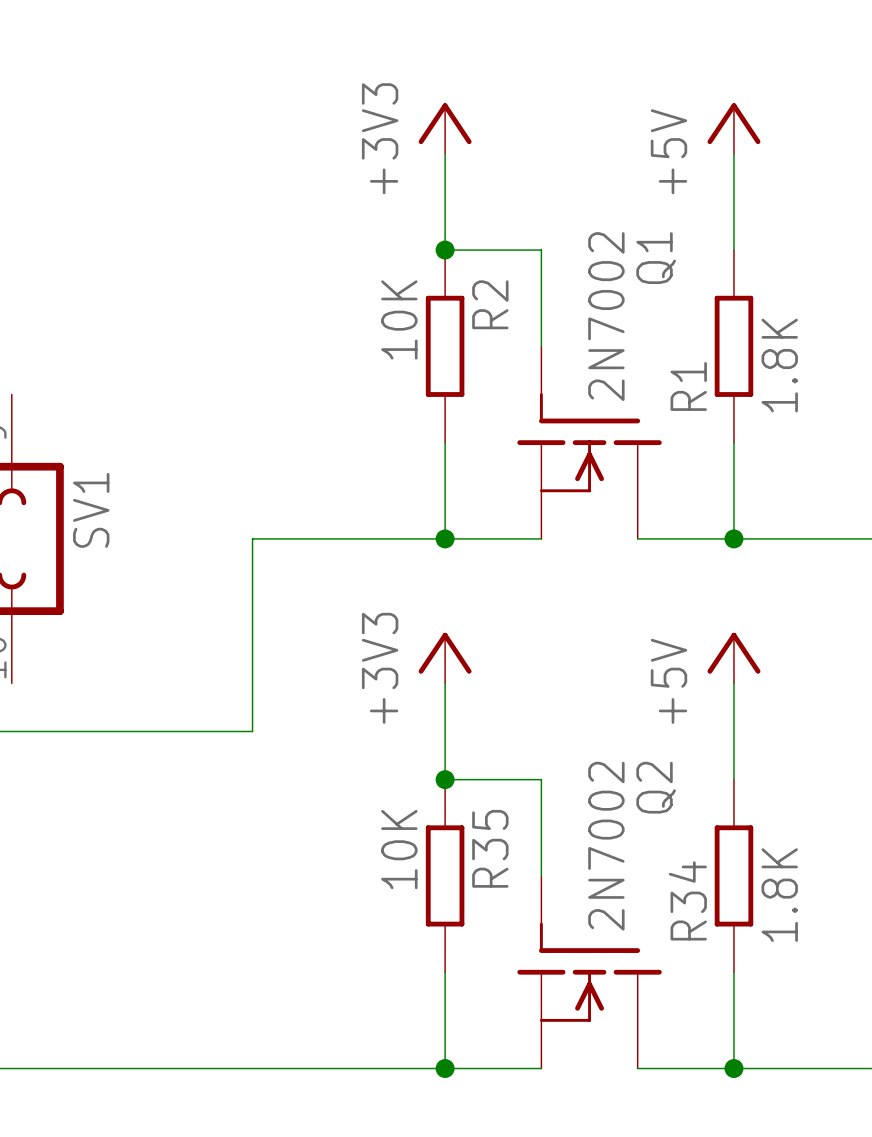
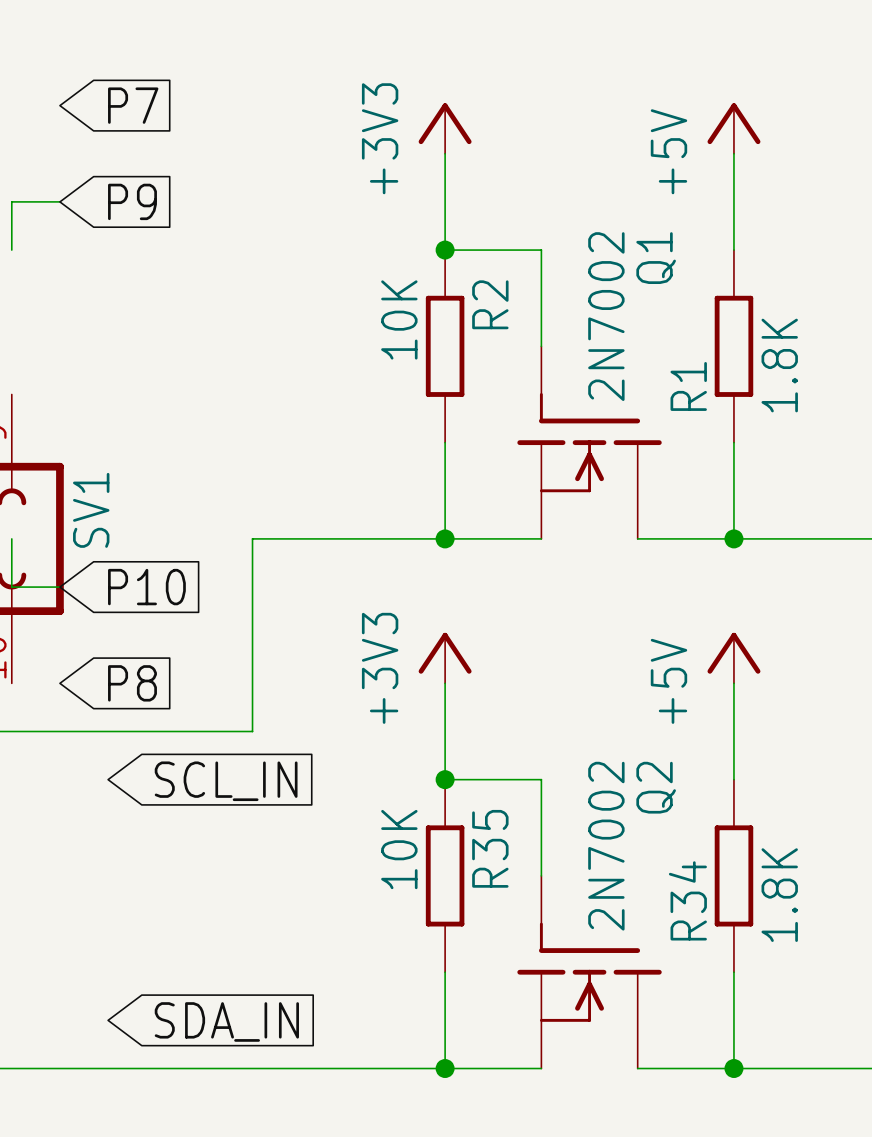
global label: none -> P7 (133, 105)
wire: none -> (59, 201) (11, 201) (11, 250)
global label: none -> P9 (132, 201)
wire: none -> (11, 538) (11, 587) (59, 587)
global label: none -> P10 (146, 587)
global label: none -> P8 (132, 683)
global label: none -> SCL_IN (226, 781)
global label: none -> SDA_IN (226, 1021)

